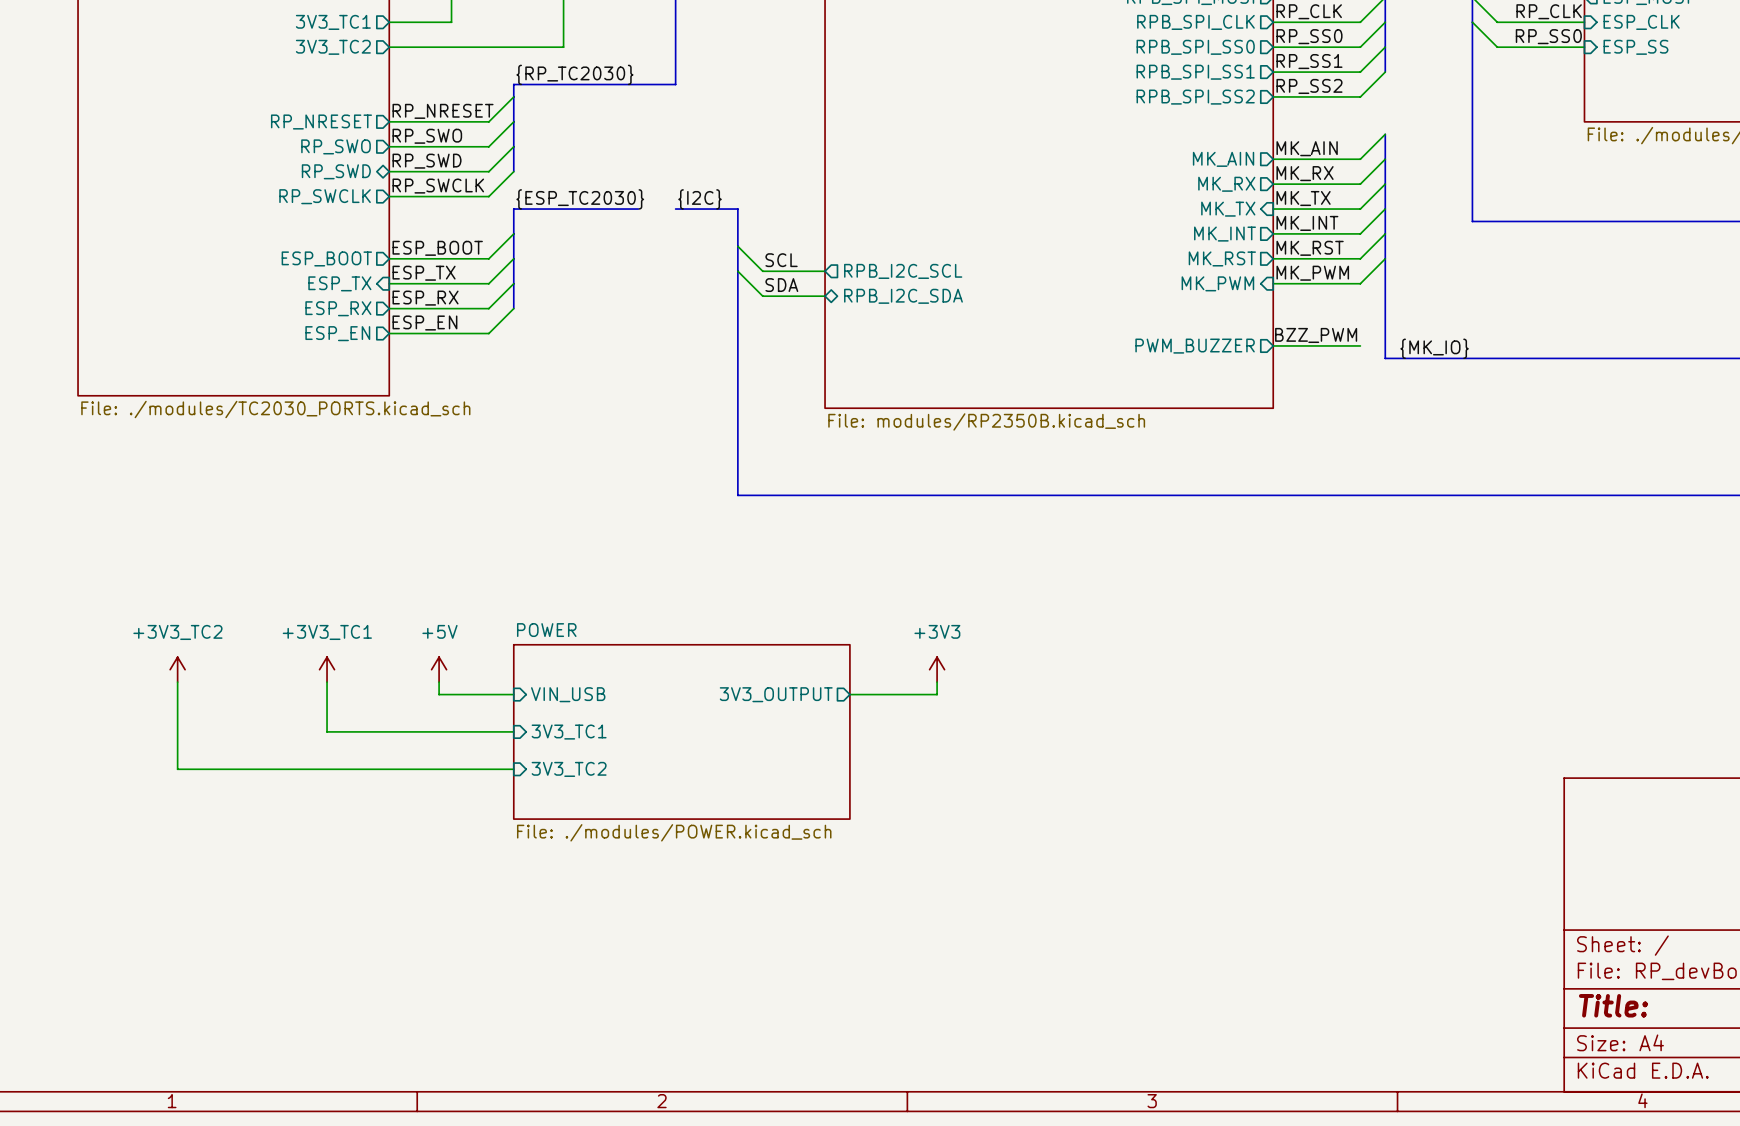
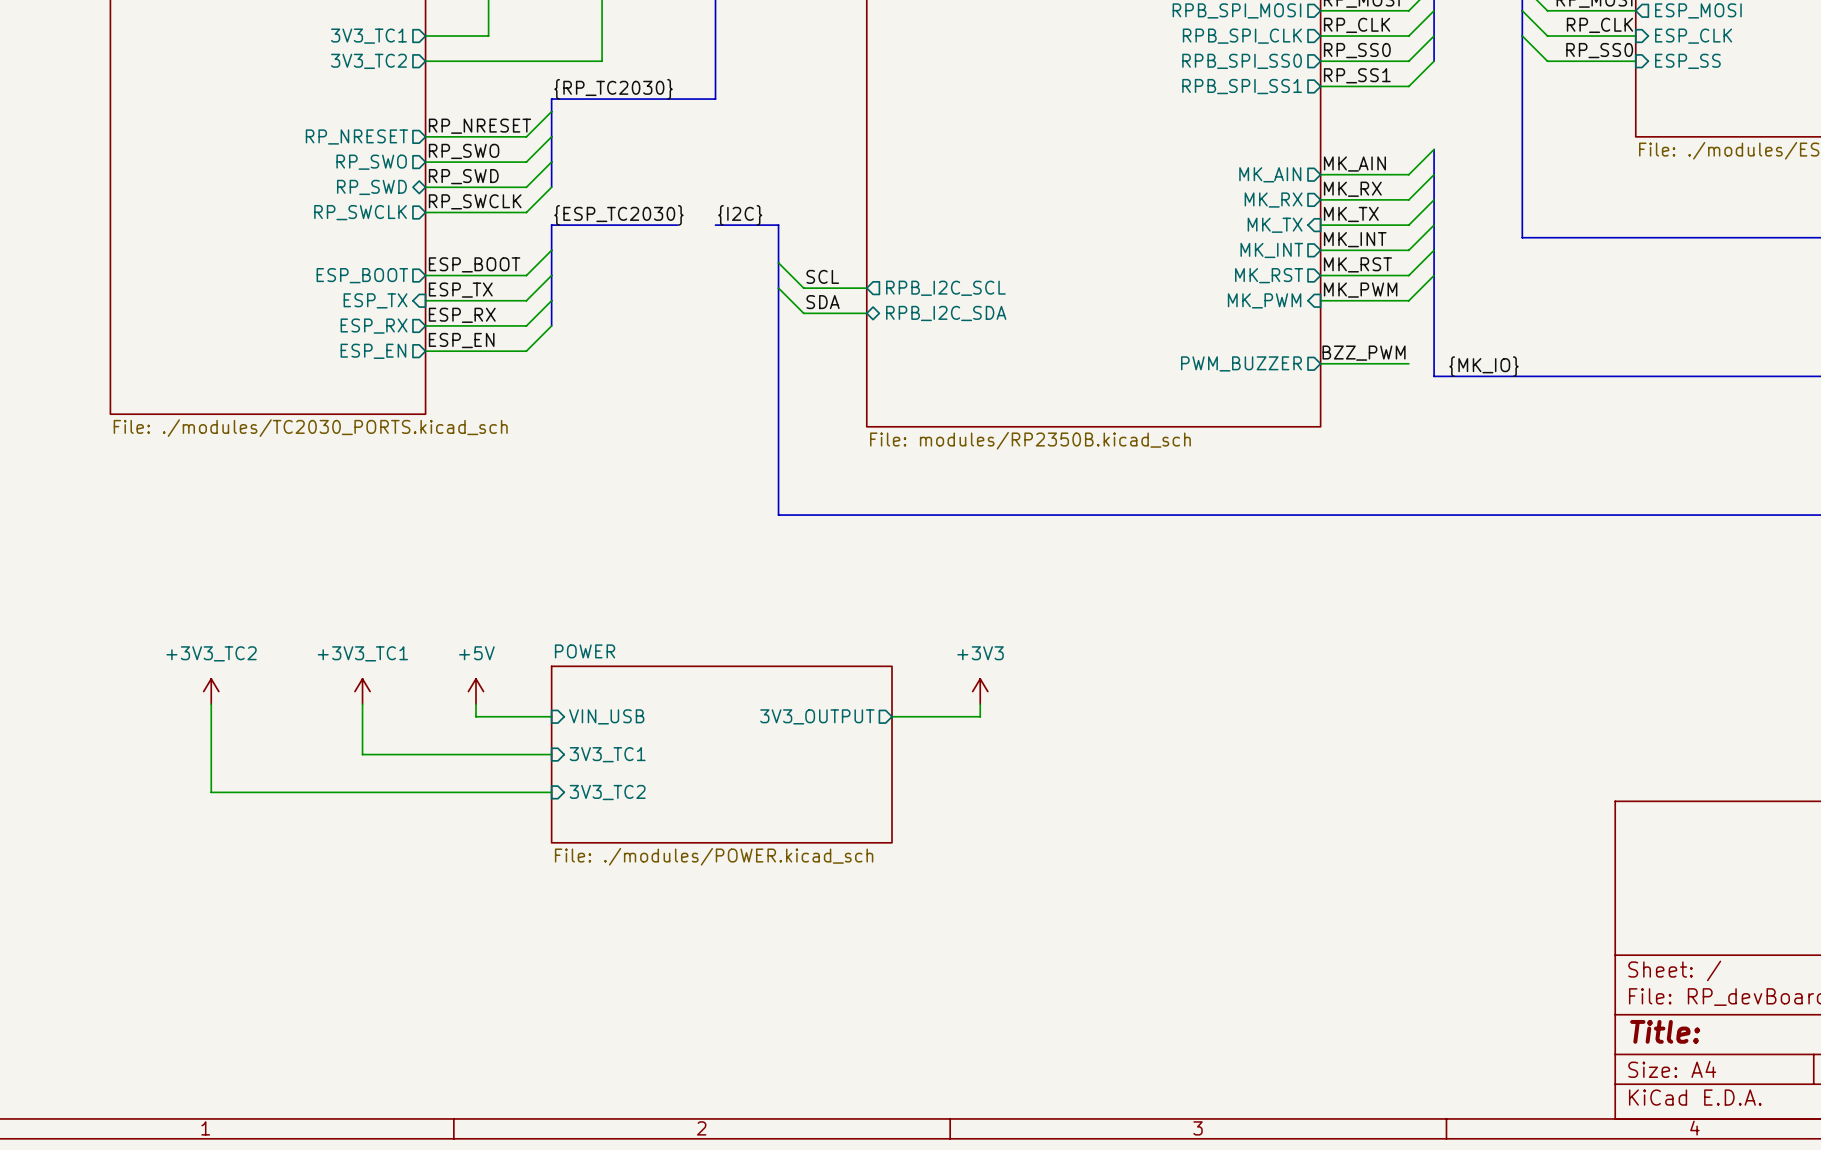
bus: (1385, 47) (1385, 72) -> none
wire: (1385, 72) (1360, 96) (1273, 96) -> none
label: RP_SS2 (1309, 86) -> none
sheet pin: RPB_SPI_SS2 (1195, 97) -> none

